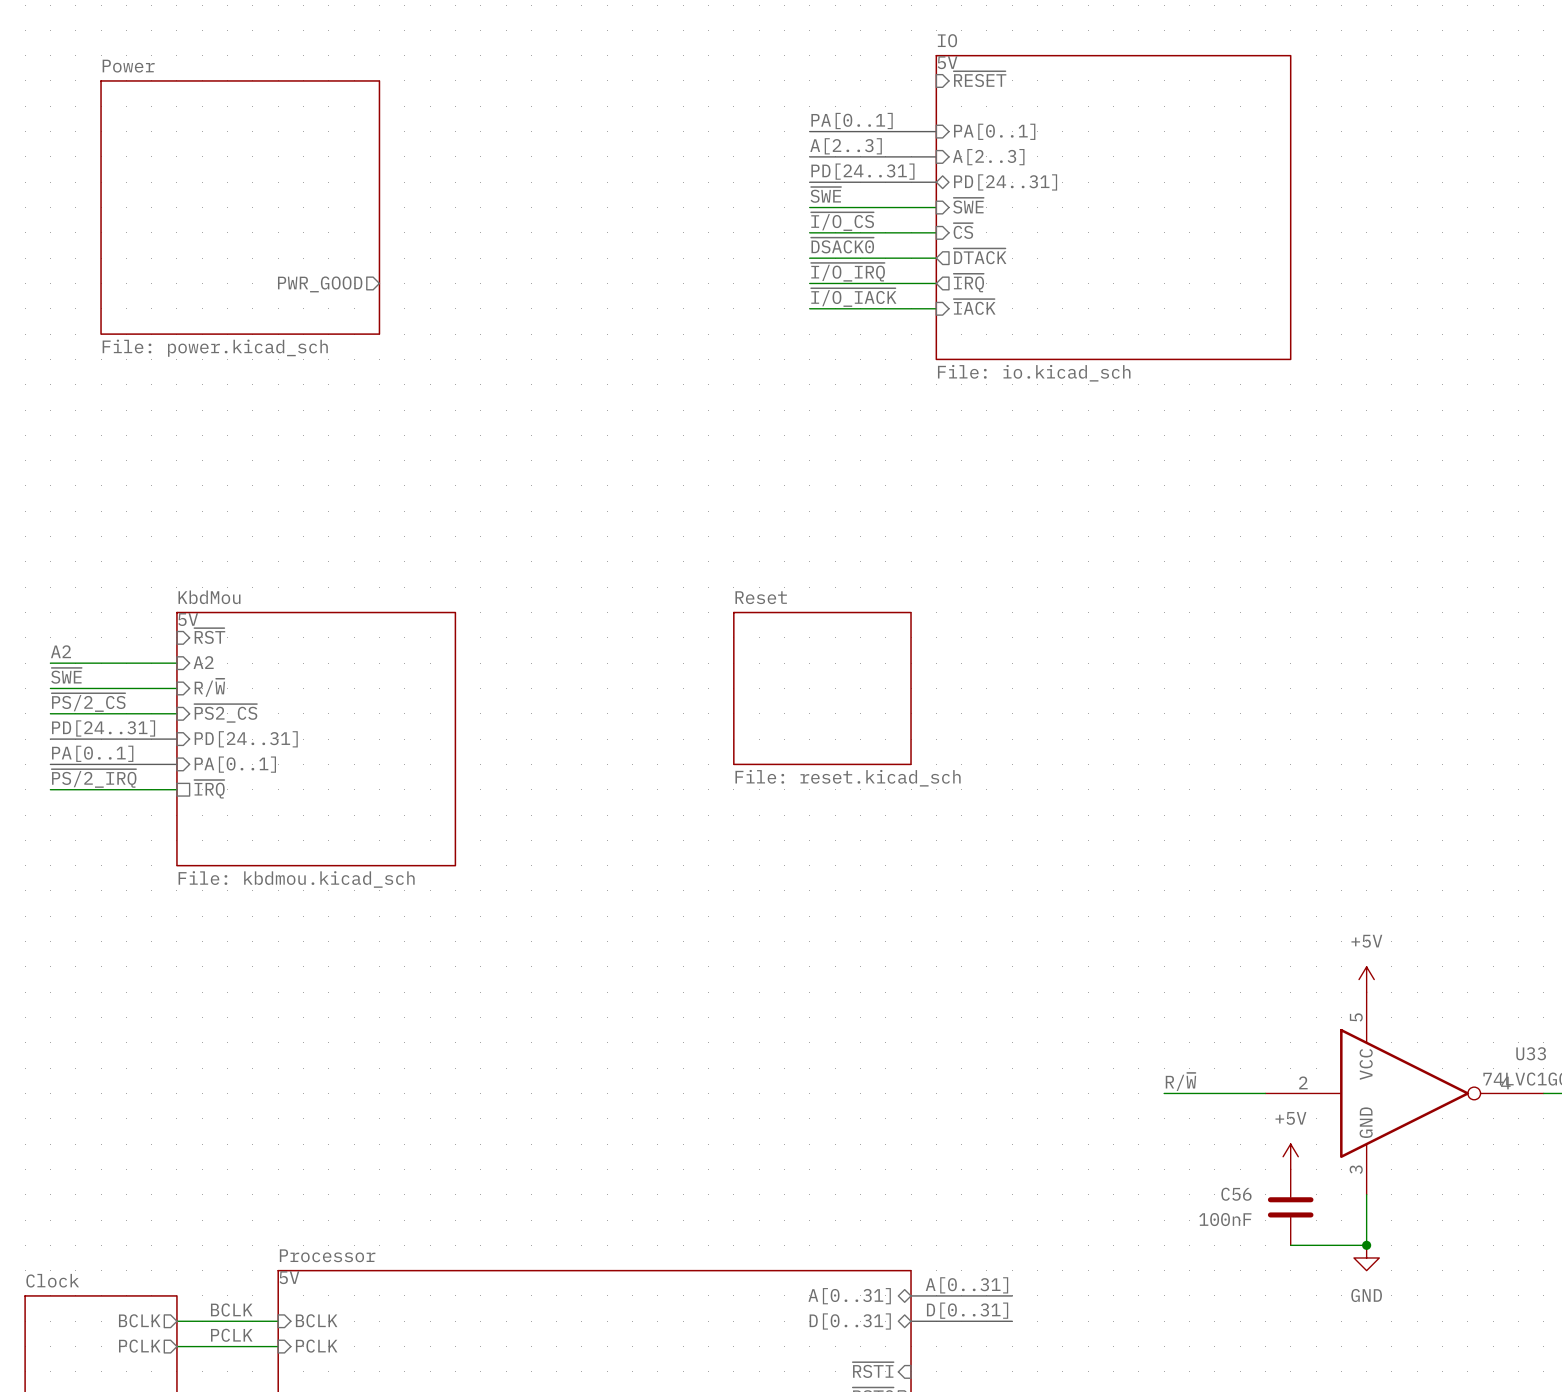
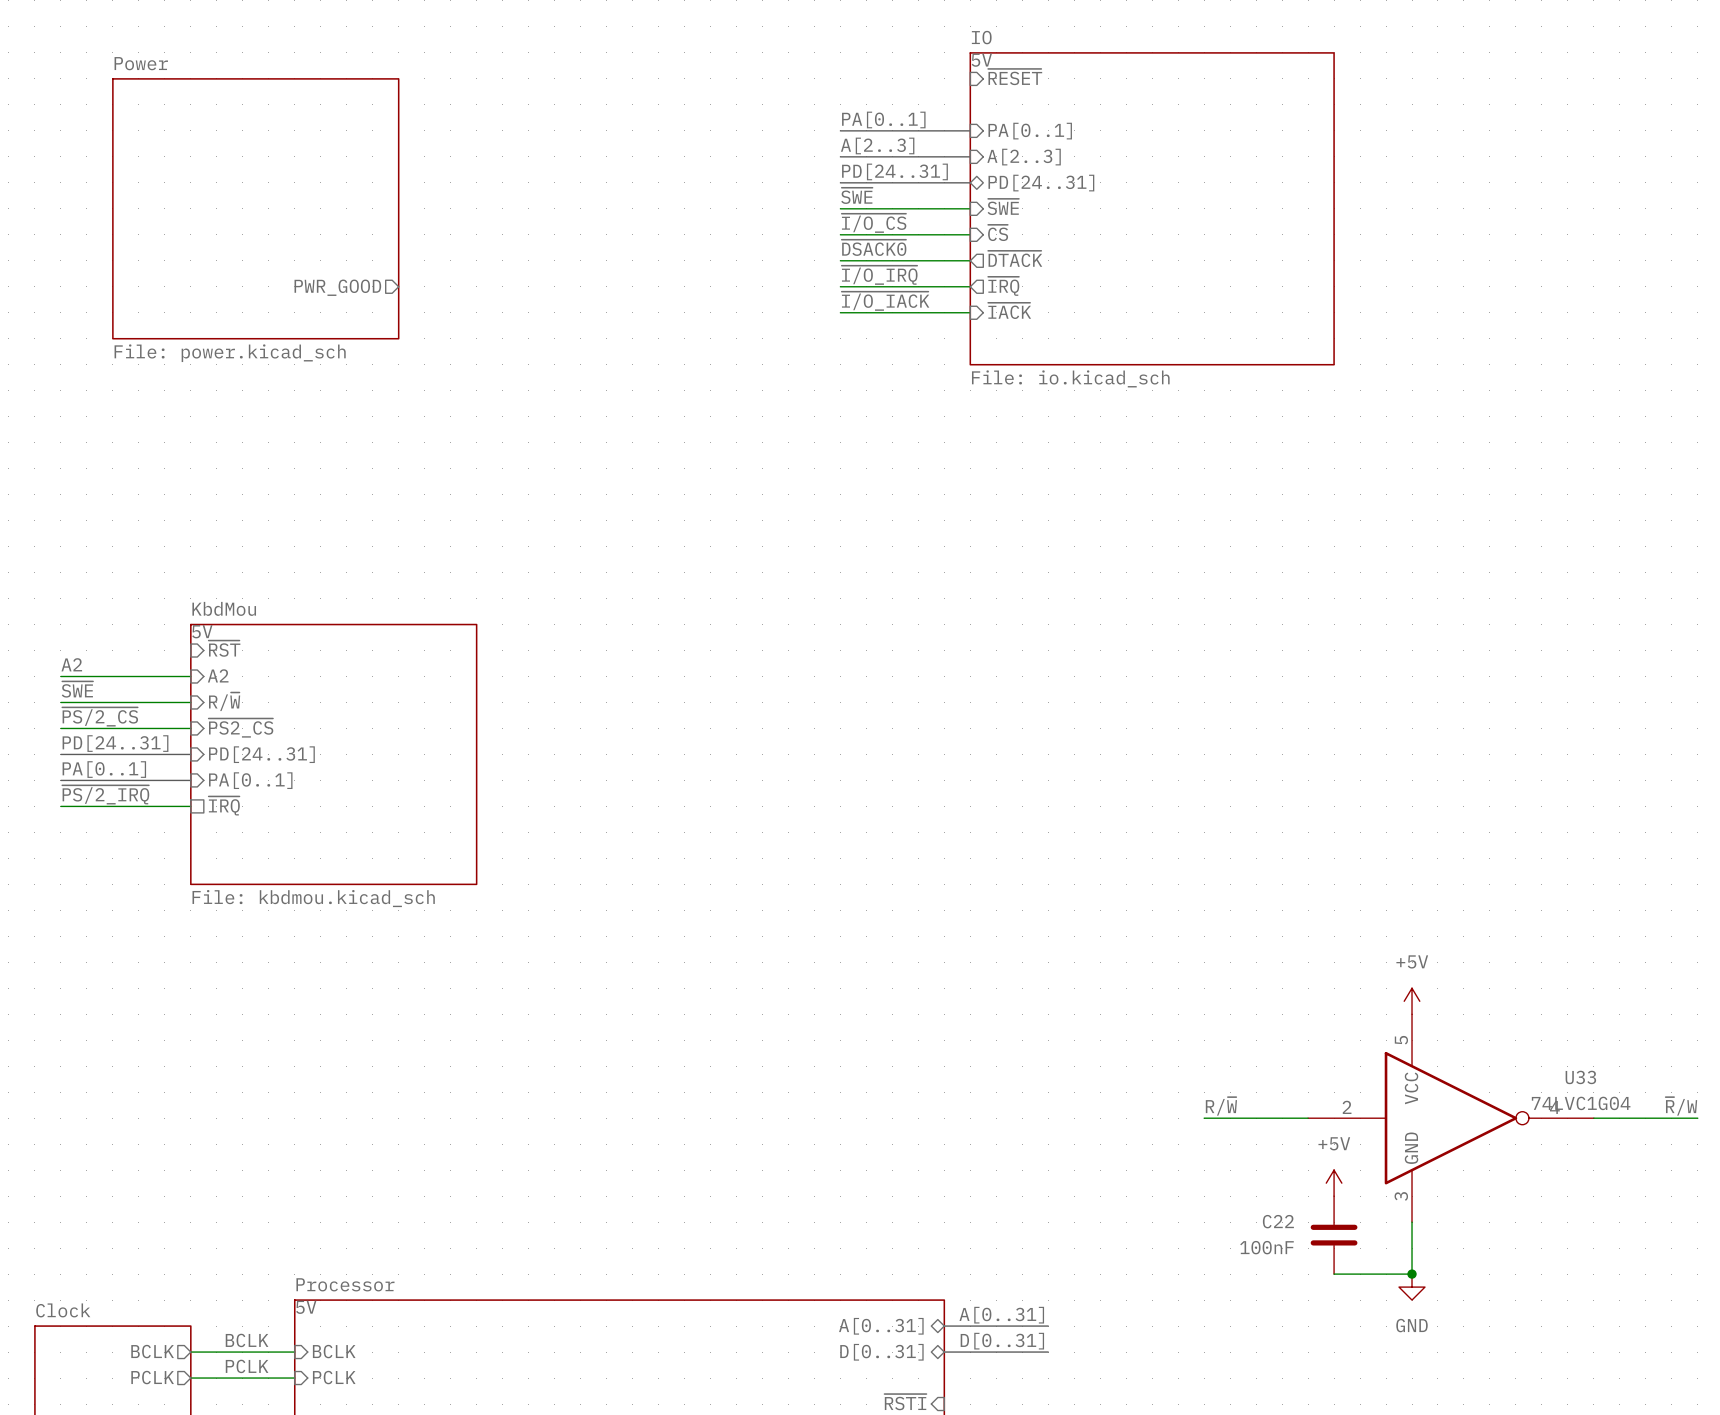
sheet Reset: File: reset.kicad_sch (822, 688) -> none
C56 name: C56 (1236, 1194) -> C22 (1278, 1221)

